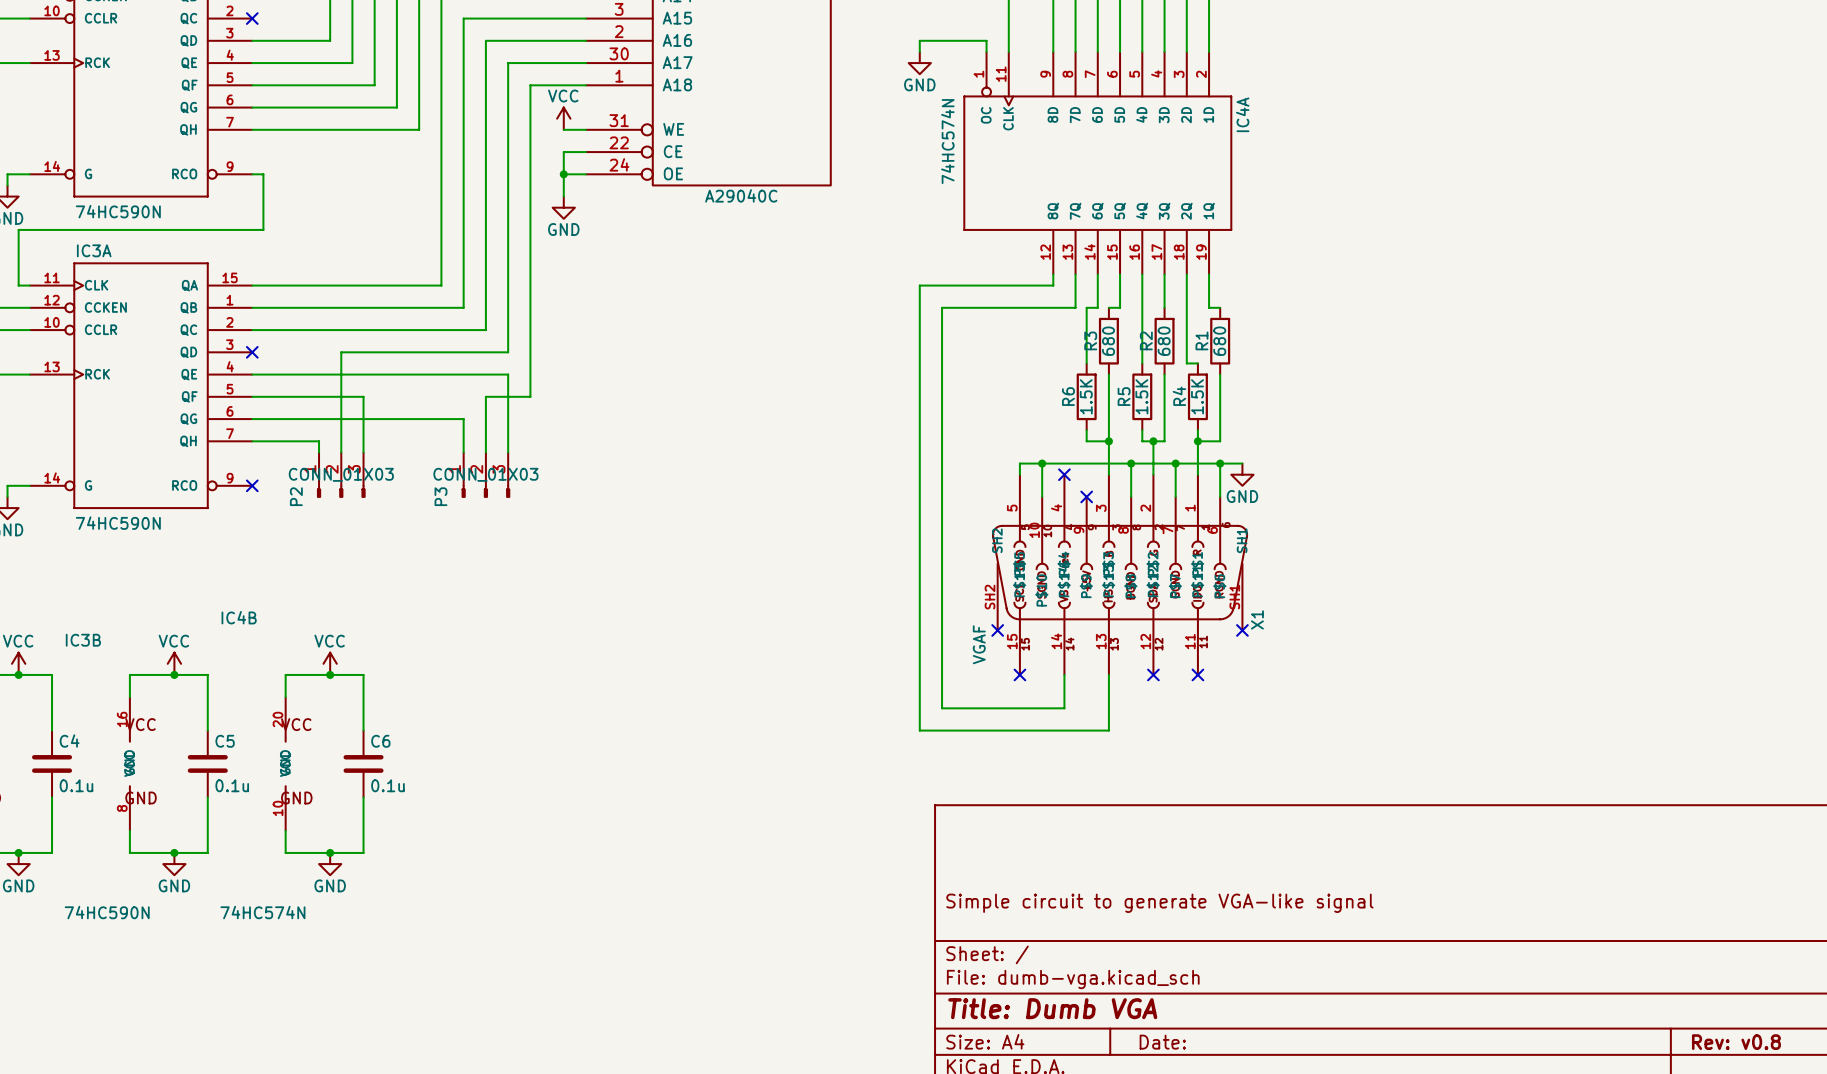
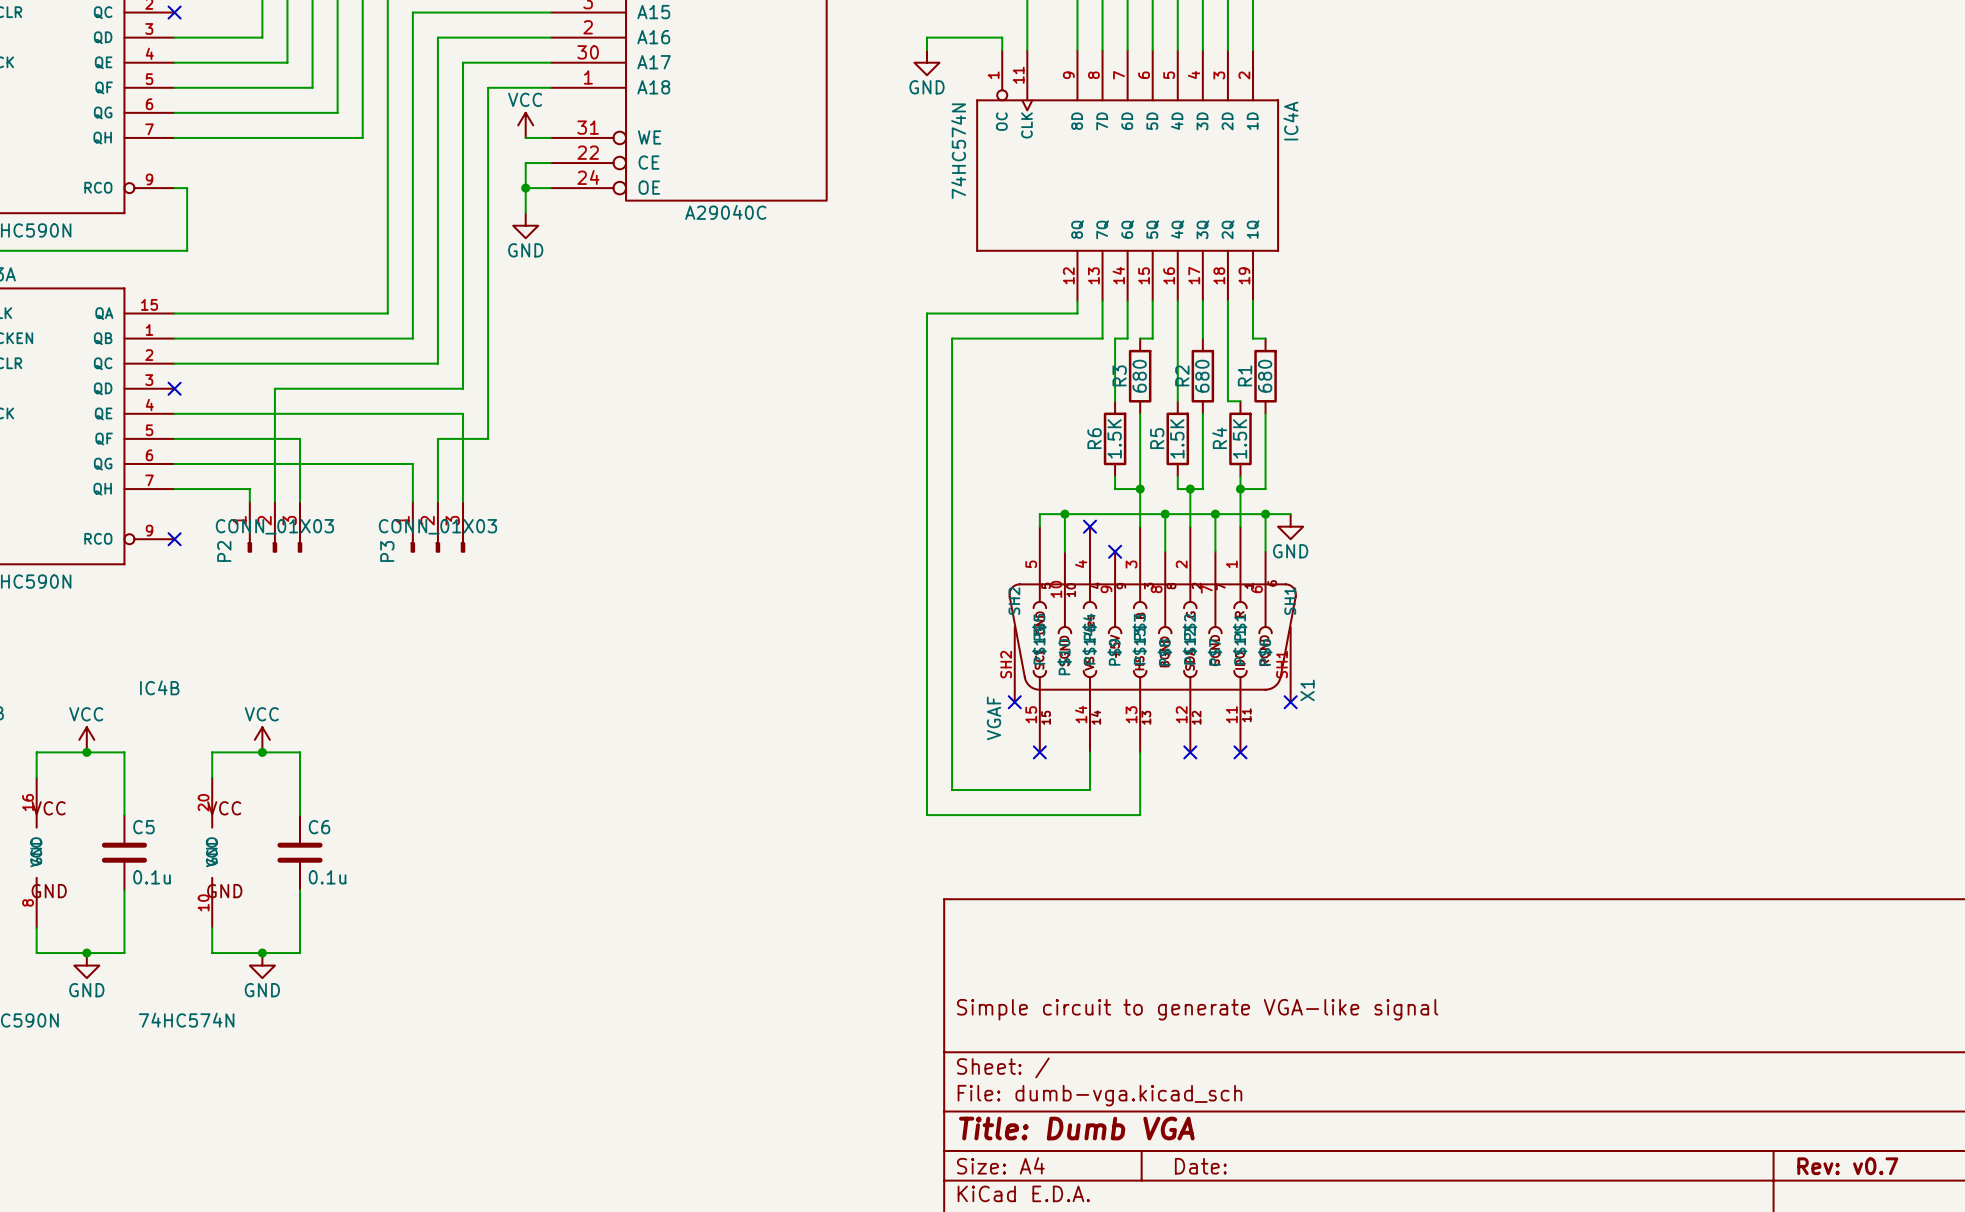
title block: Rev: v0.8 (1736, 1042) -> Rev: v0.7 (1847, 1166)

